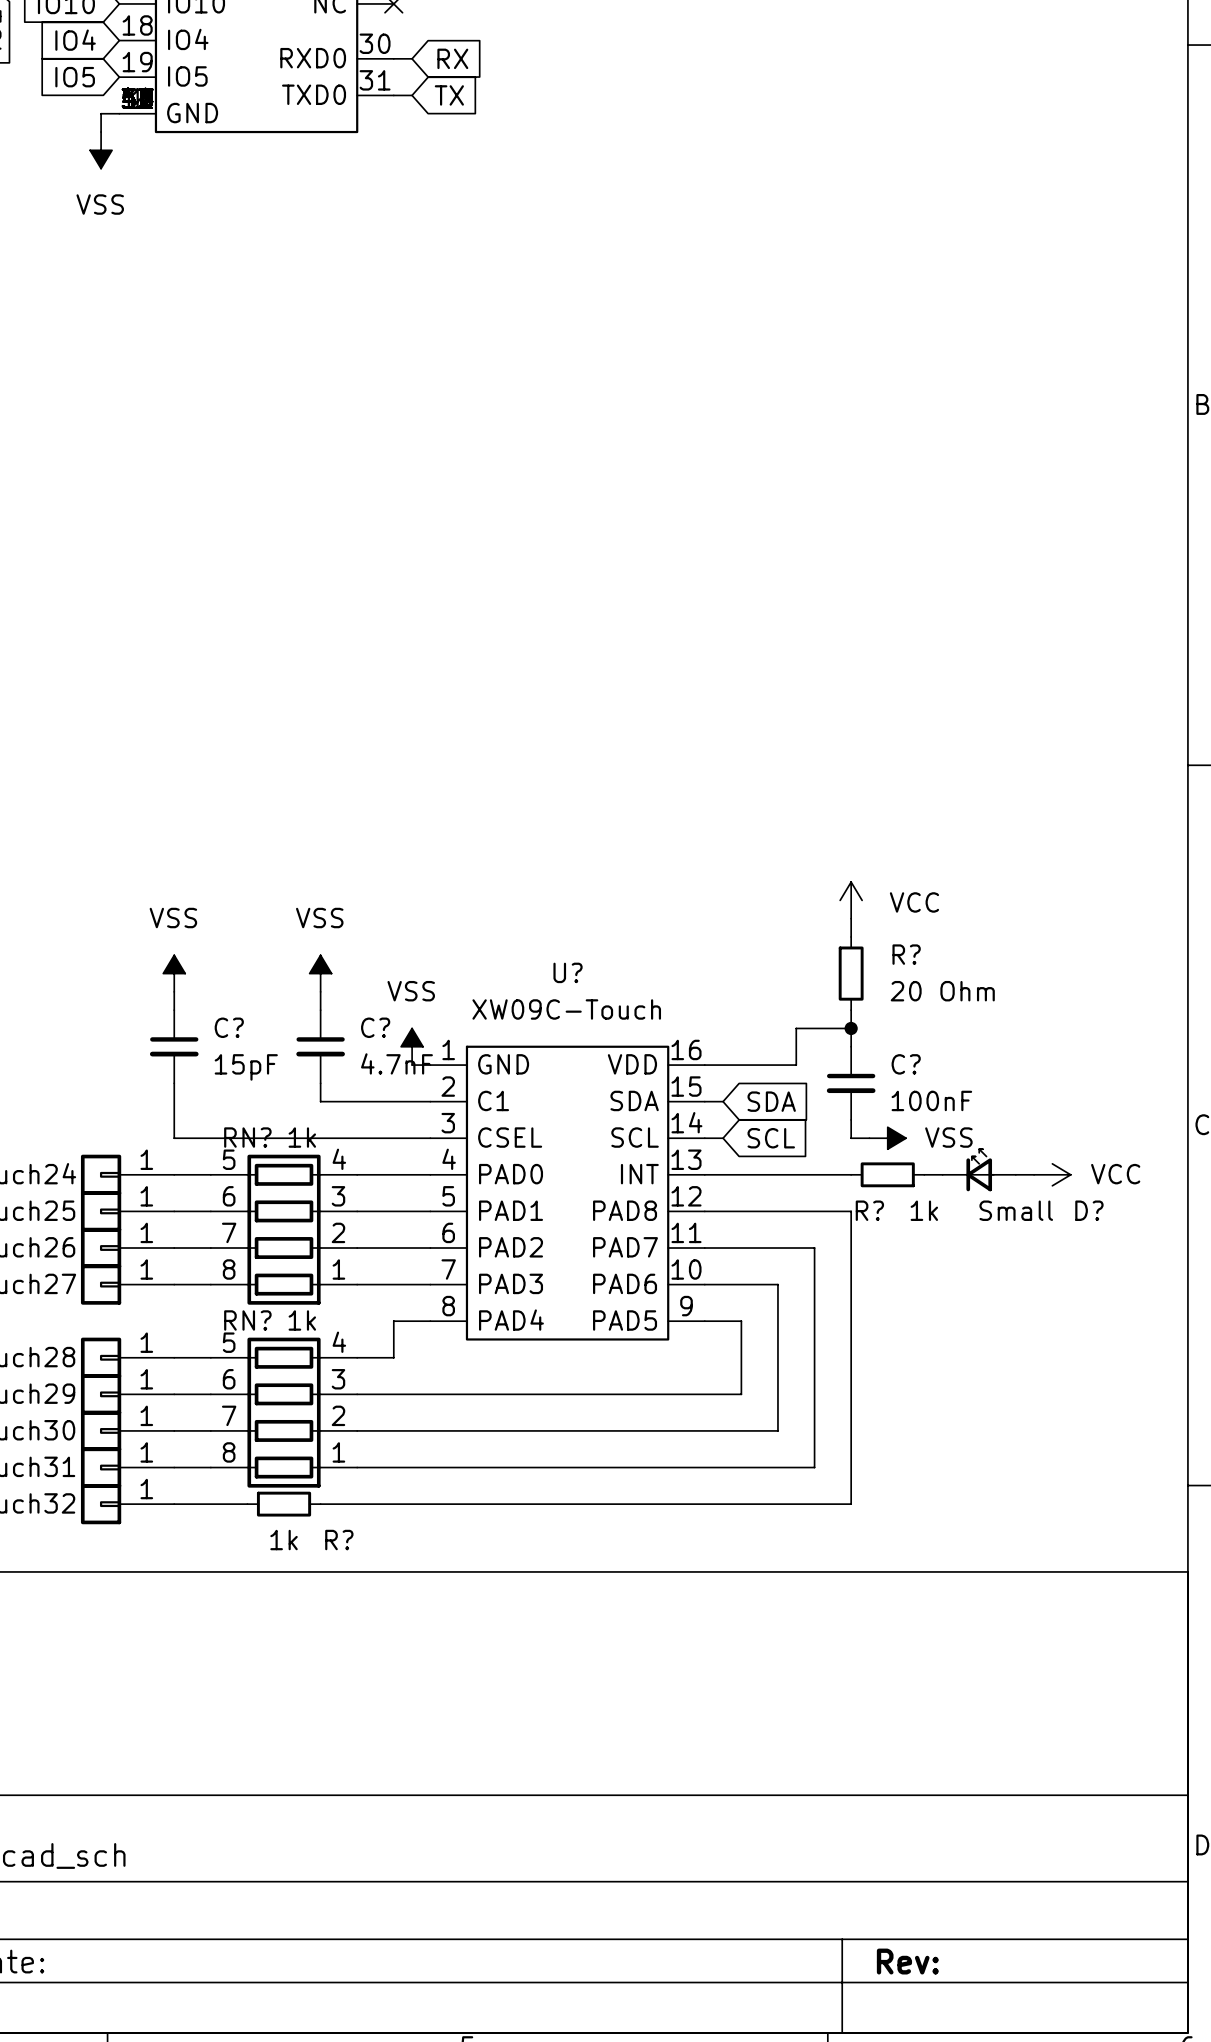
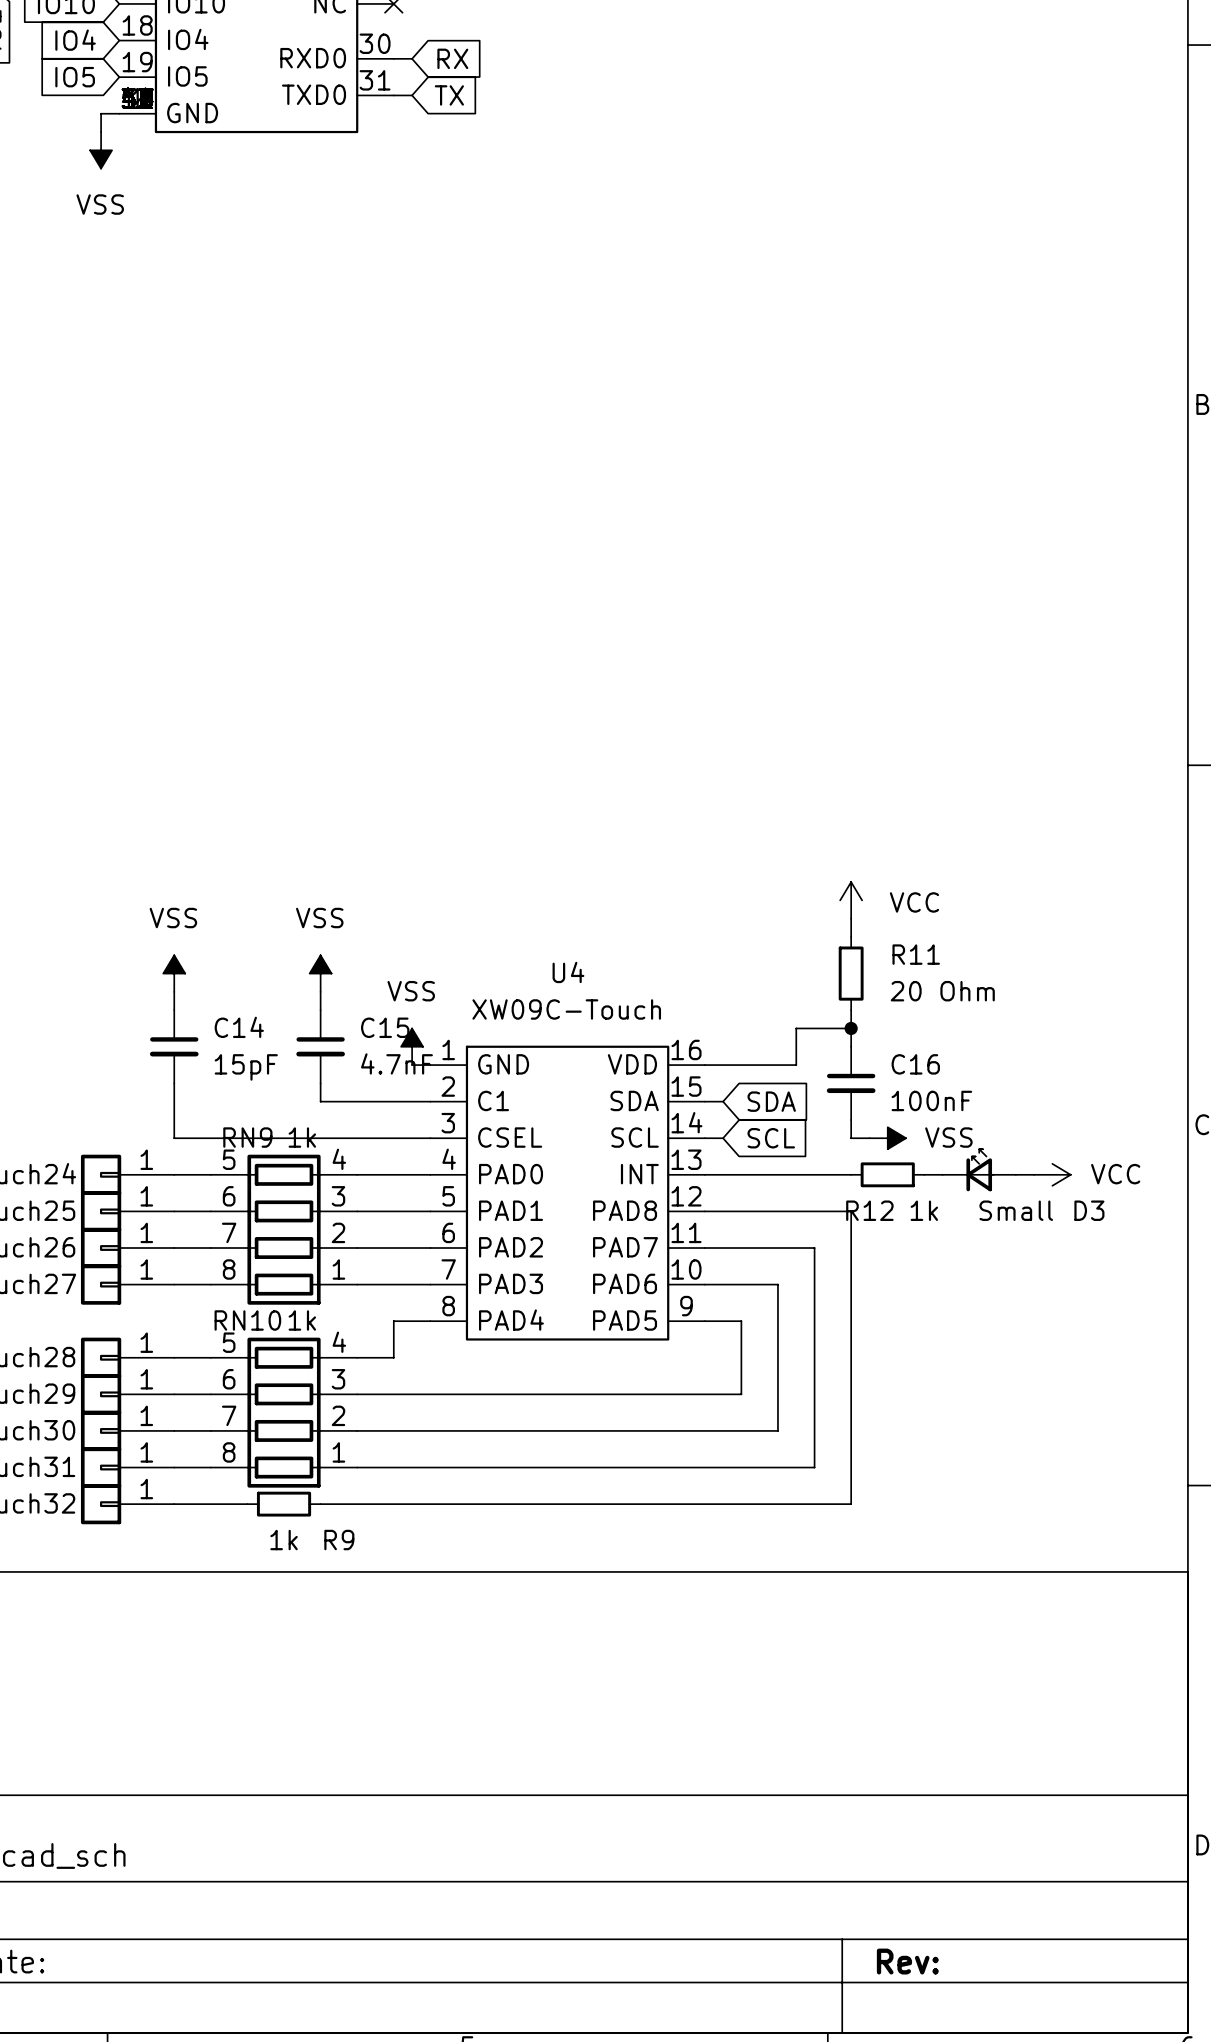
R? name: R? (906, 954) -> R11 (916, 954)
U? name: U? (568, 972) -> U4 (568, 972)
C? name: C? (229, 1027) -> C14 (239, 1027)
C? name: C? (375, 1027) -> C15 (385, 1027)
C? name: C? (906, 1064) -> C16 (915, 1064)
RN? name: RN? (247, 1137) -> RN9 (247, 1137)
R? name: R? (869, 1210) -> R12 (869, 1210)
D? name: D? (1089, 1210) -> D3 (1089, 1210)
RN? name: RN? (247, 1320) -> RN10 (247, 1320)
R? name: R? (339, 1540) -> R9 (339, 1540)

